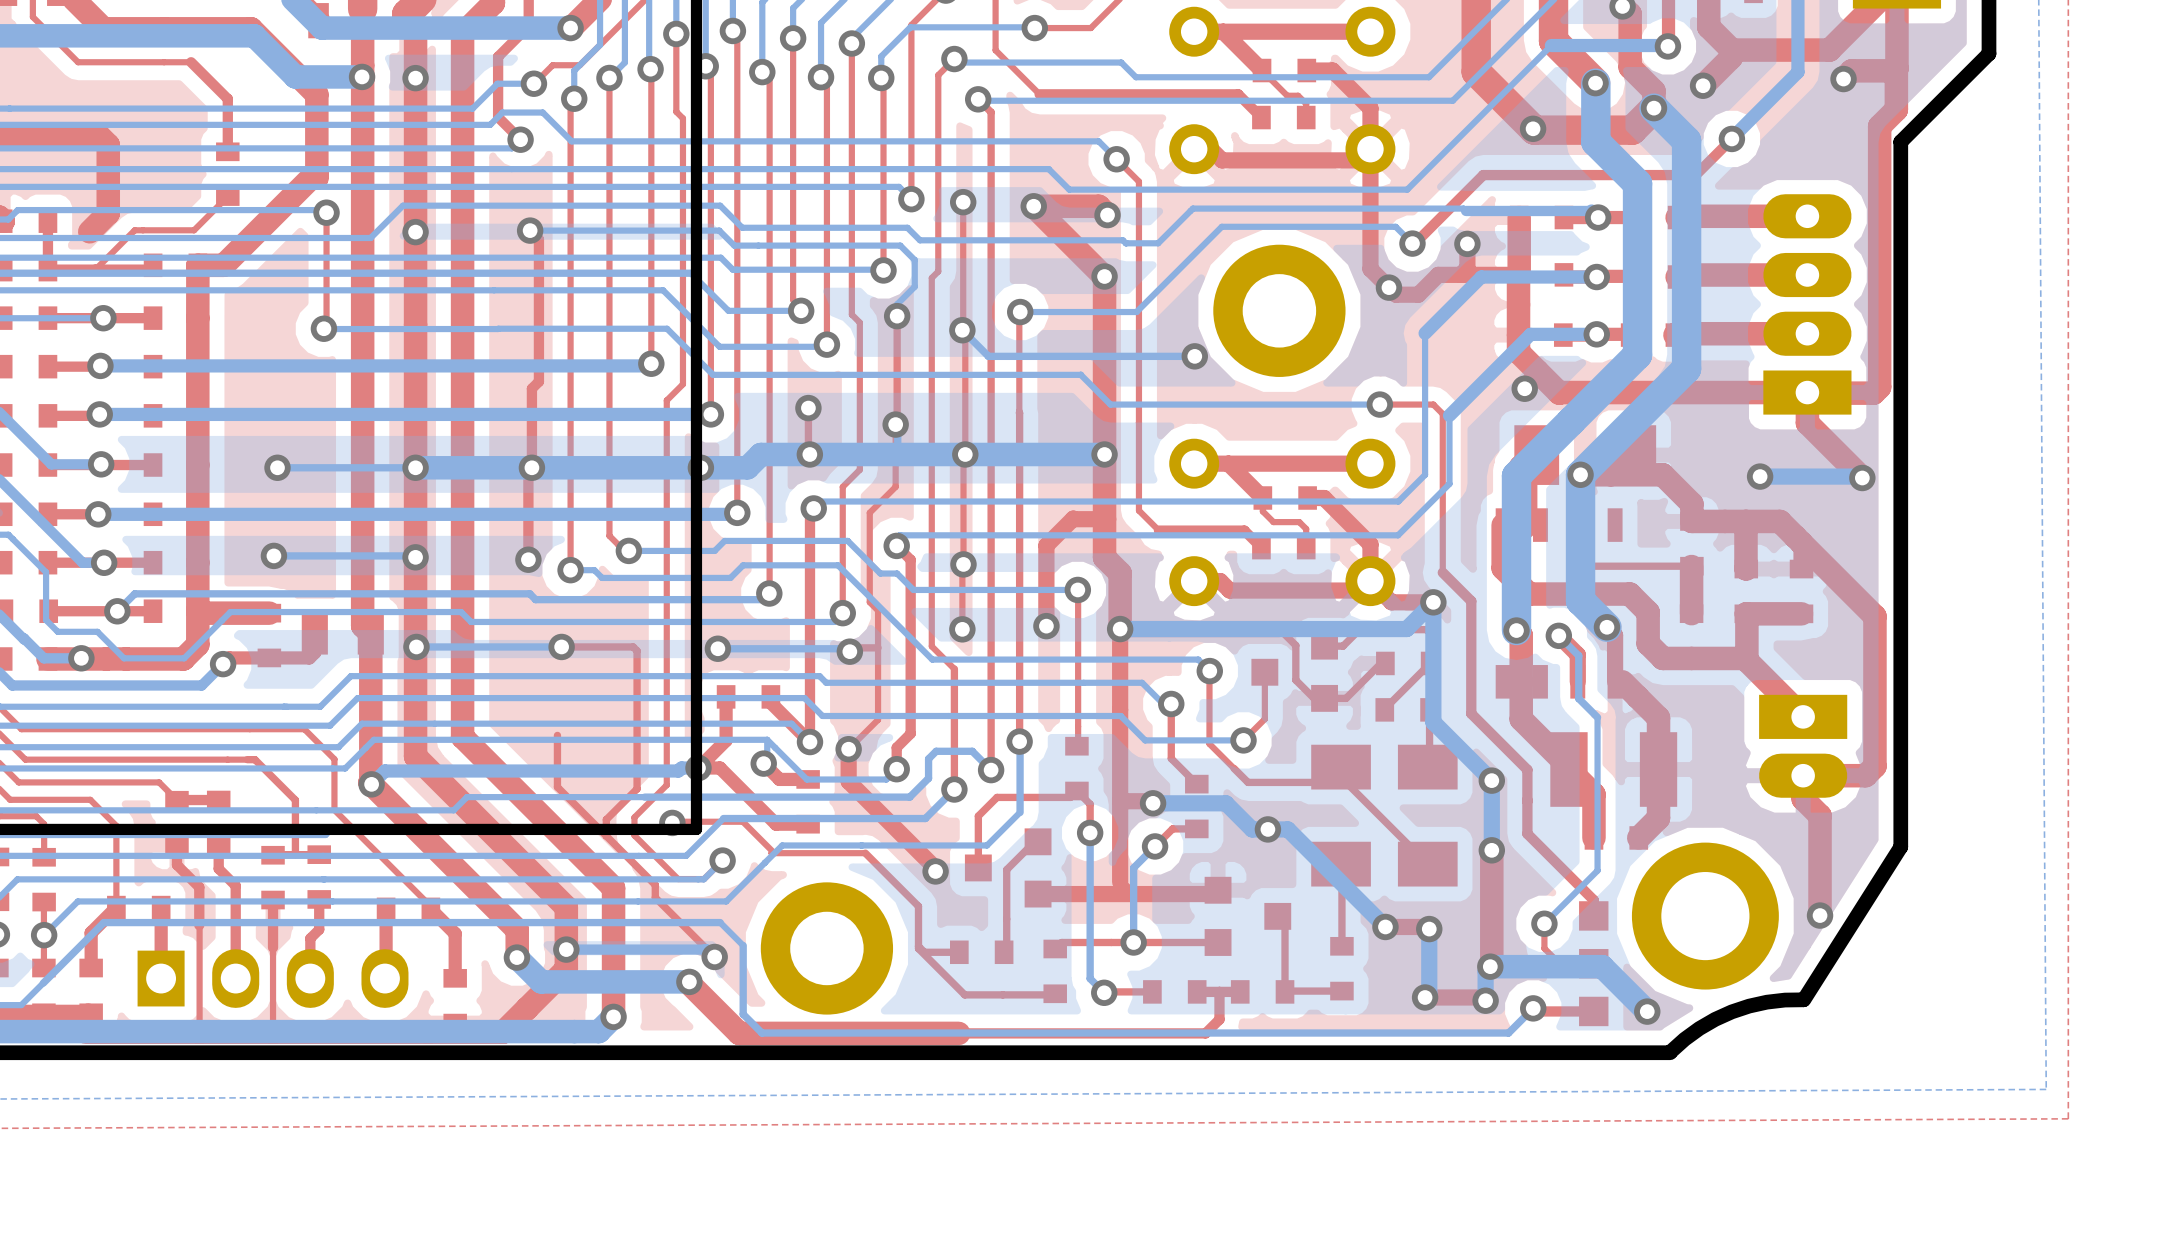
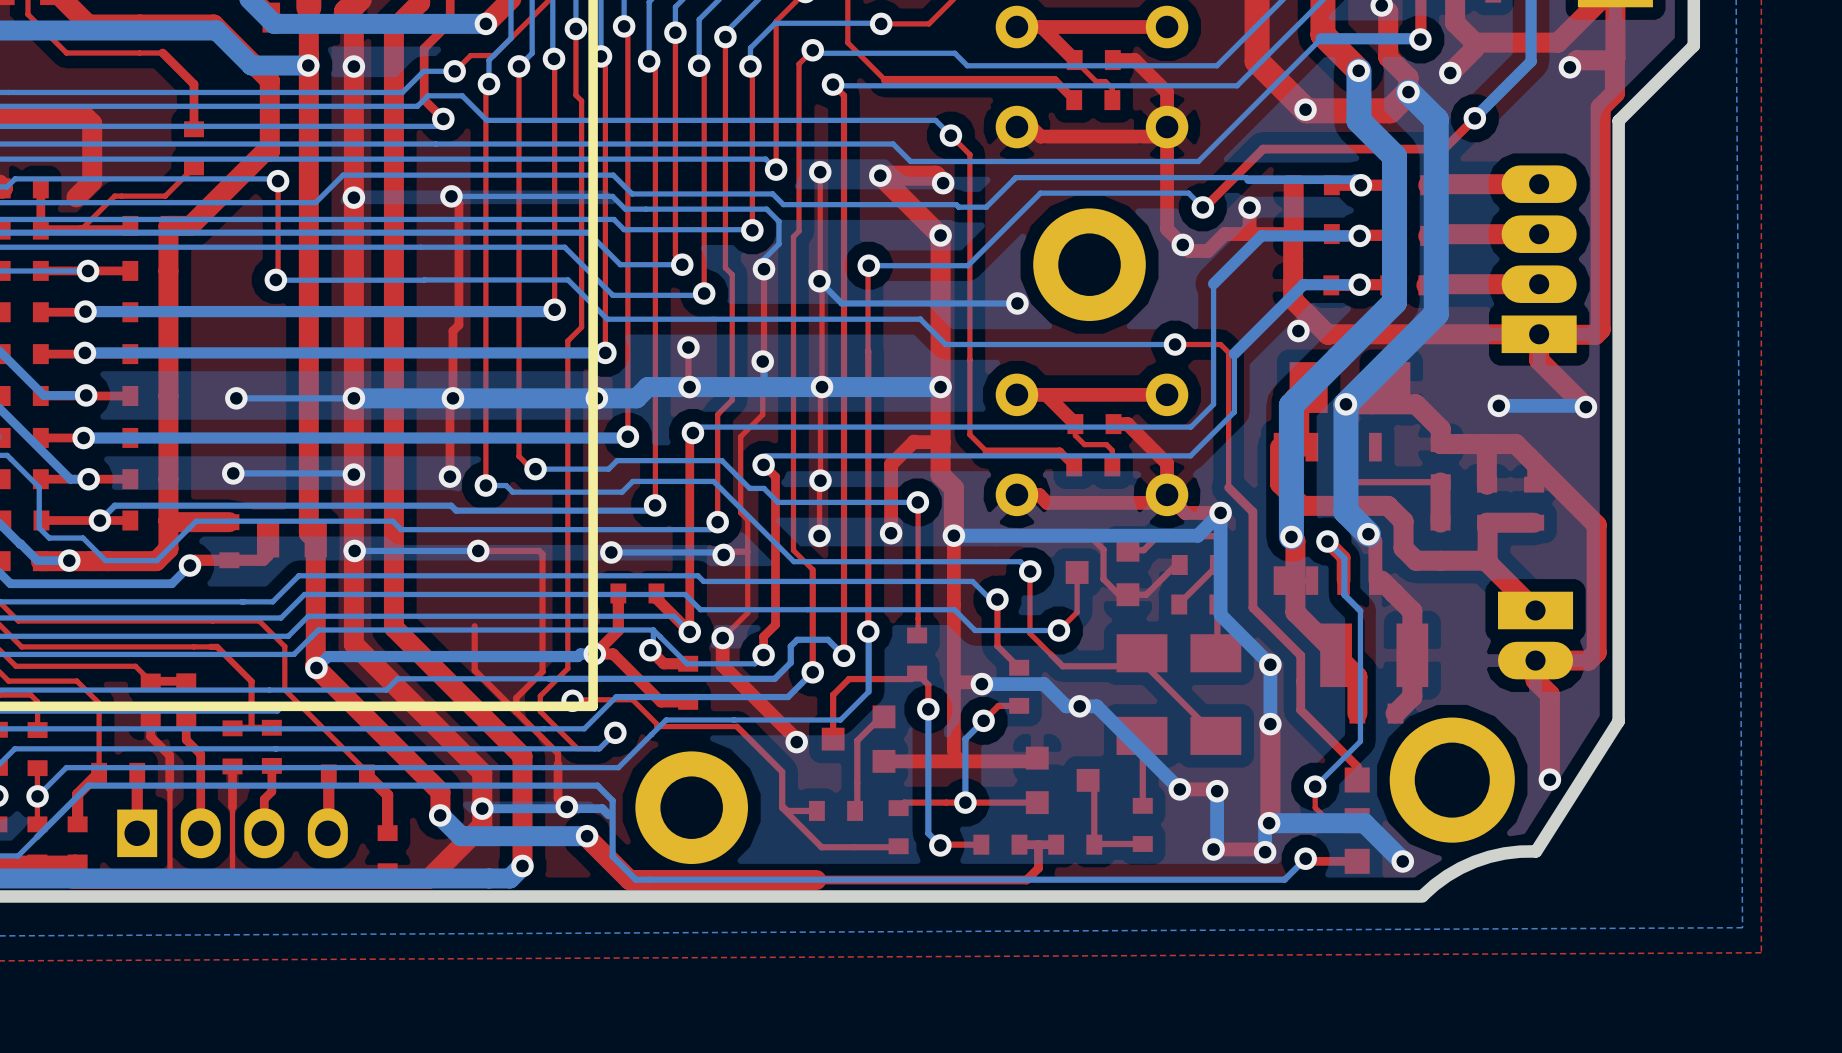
top track: (655, 897) (714, 956) -> (558, 764) (558, 798) (566, 806)
bottom track: (701, 922) (720, 922) (743, 945) (743, 1014) (761, 1033) -> (597, 785) (612, 800) (612, 856) (635, 879) (648, 879)
part position: (826, 948) -> (691, 807)
via position: (714, 956) -> (566, 806)

